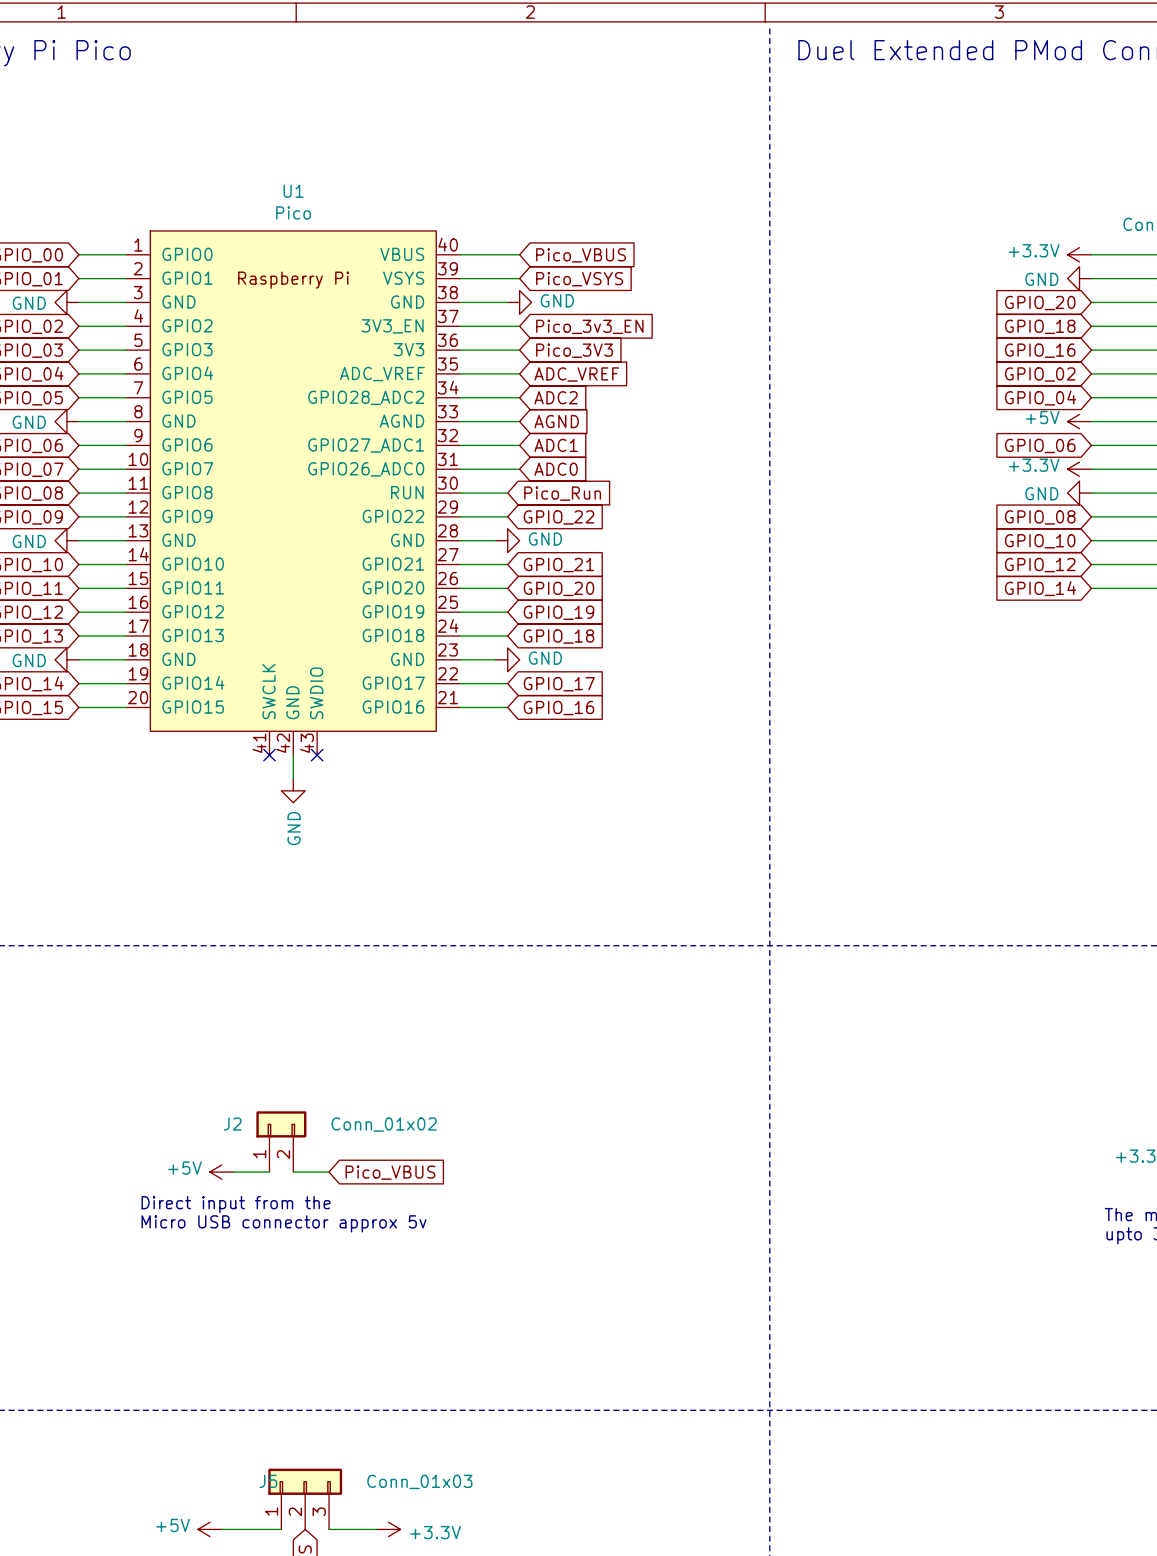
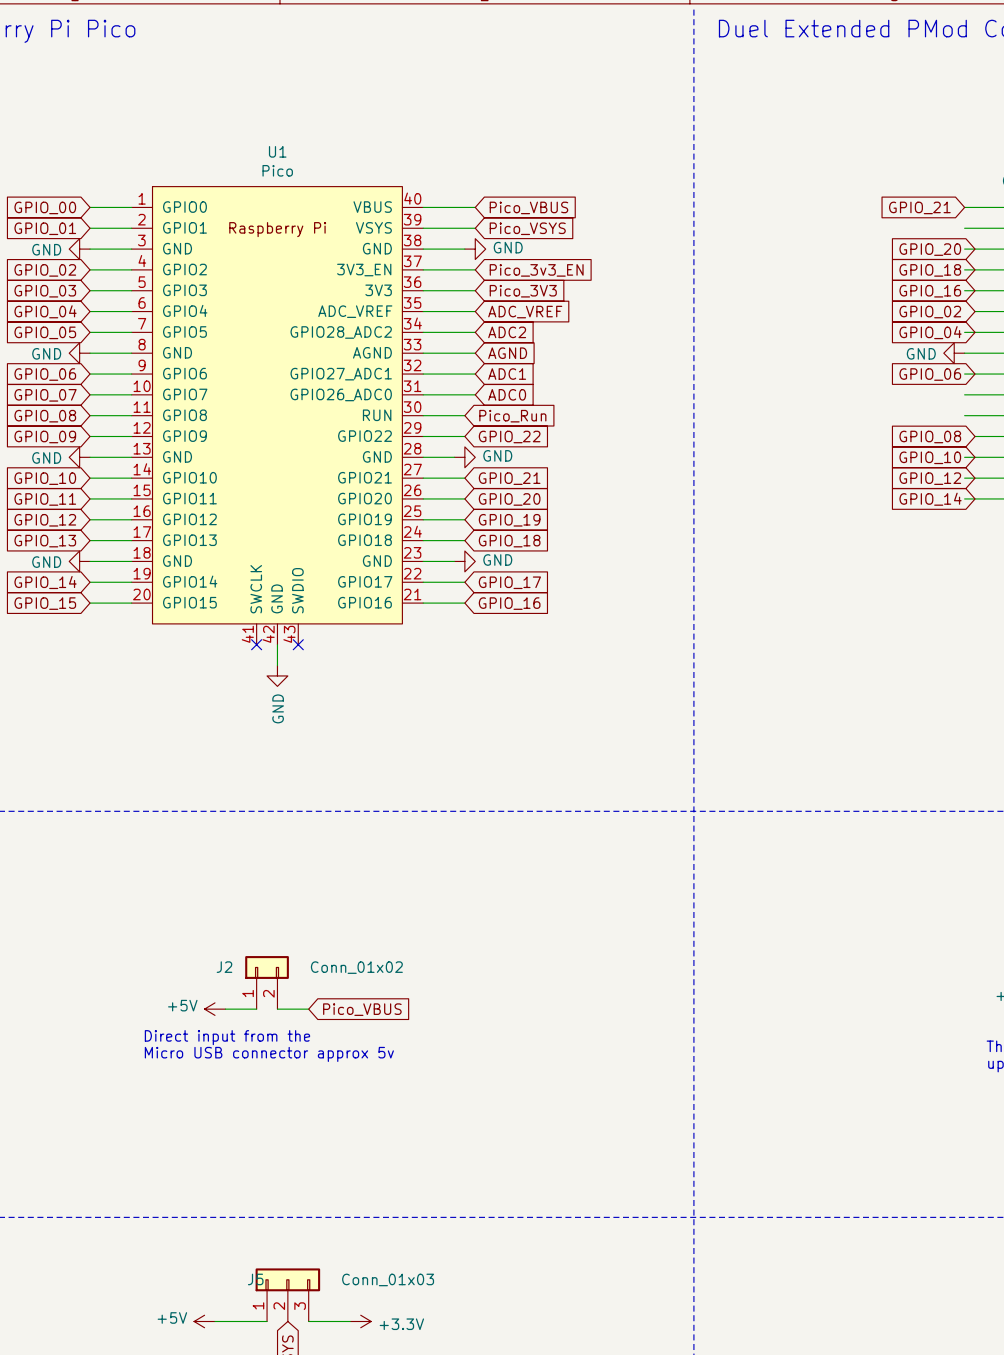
power symbol: +3.3V (1079, 254) -> none
global label: none -> GPIO_21 (919, 207)
power symbol: GND (1079, 278) -> none
wire: none -> (964, 249) (975, 249)
wire: none -> (964, 269) (975, 269)
wire: none -> (964, 290) (975, 290)
wire: none -> (964, 332) (975, 332)
power symbol: none -> GND (954, 353)
power symbol: +5V (1079, 421) -> none
wire: none -> (964, 374) (975, 374)
power symbol: +3.3V (1079, 469) -> none
power symbol: GND (1079, 493) -> none
wire: none -> (964, 457) (975, 457)
wire: none -> (964, 478) (975, 478)
wire: none -> (964, 498) (975, 498)

